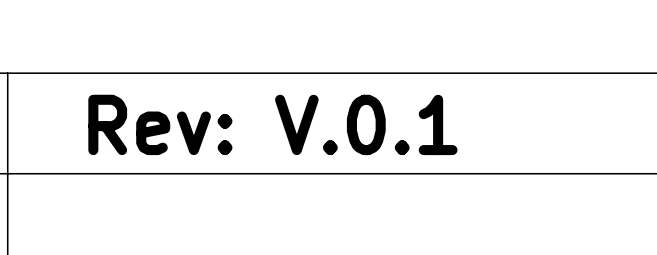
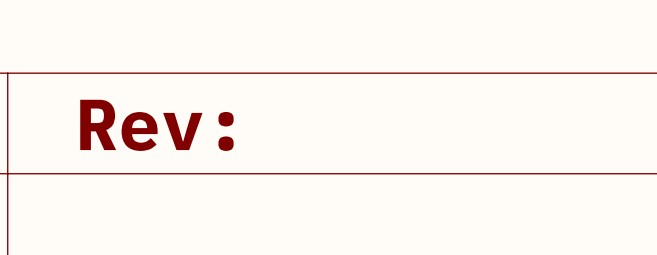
title block: Rev: V.0.1 (272, 124) -> Rev: (156, 125)

